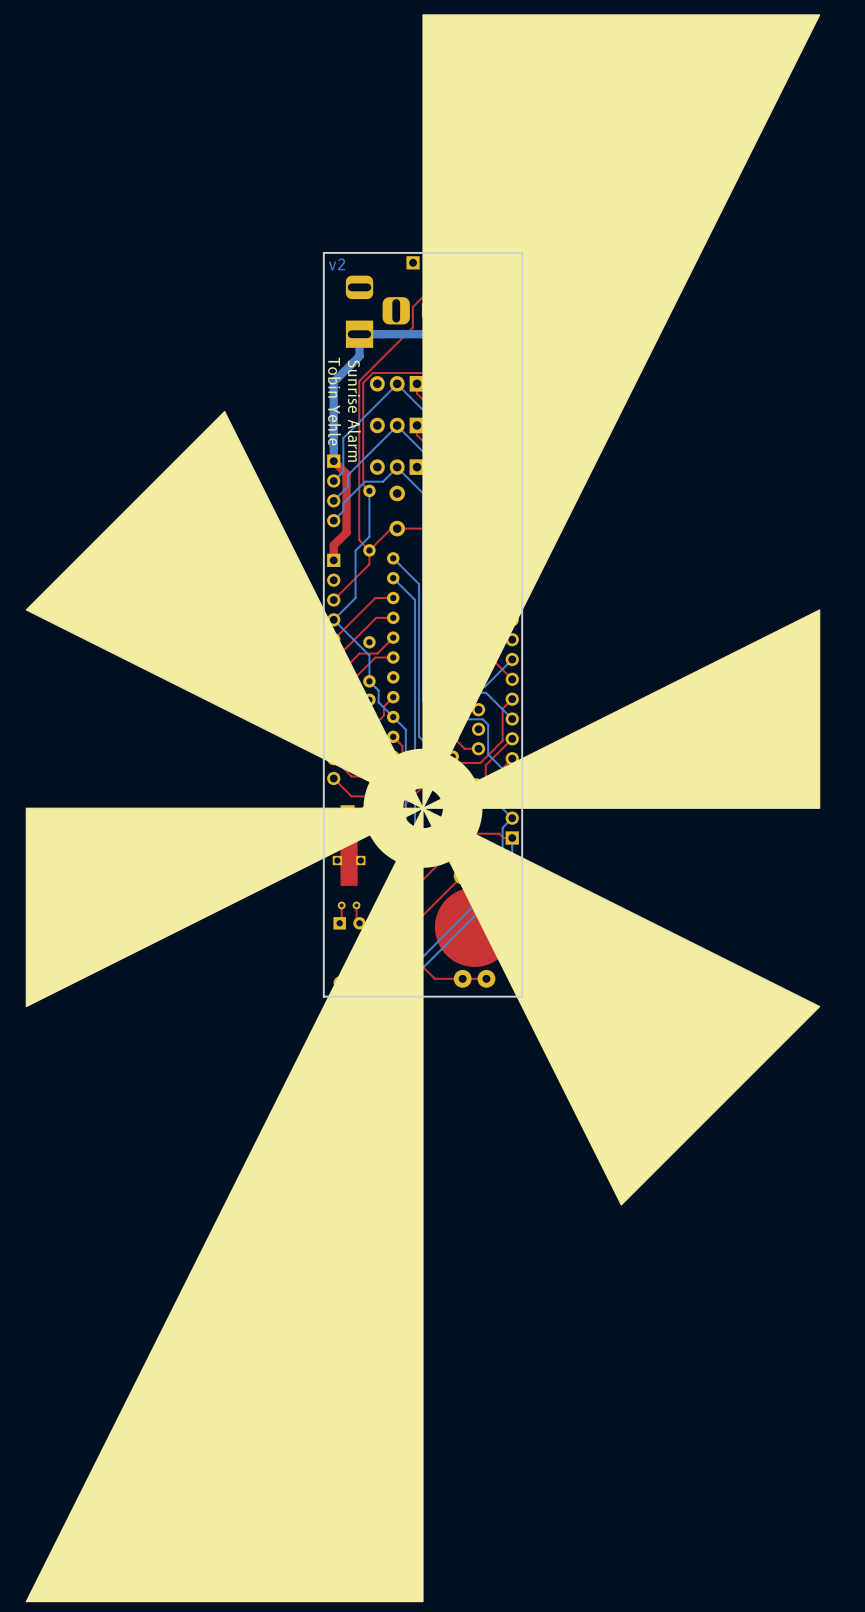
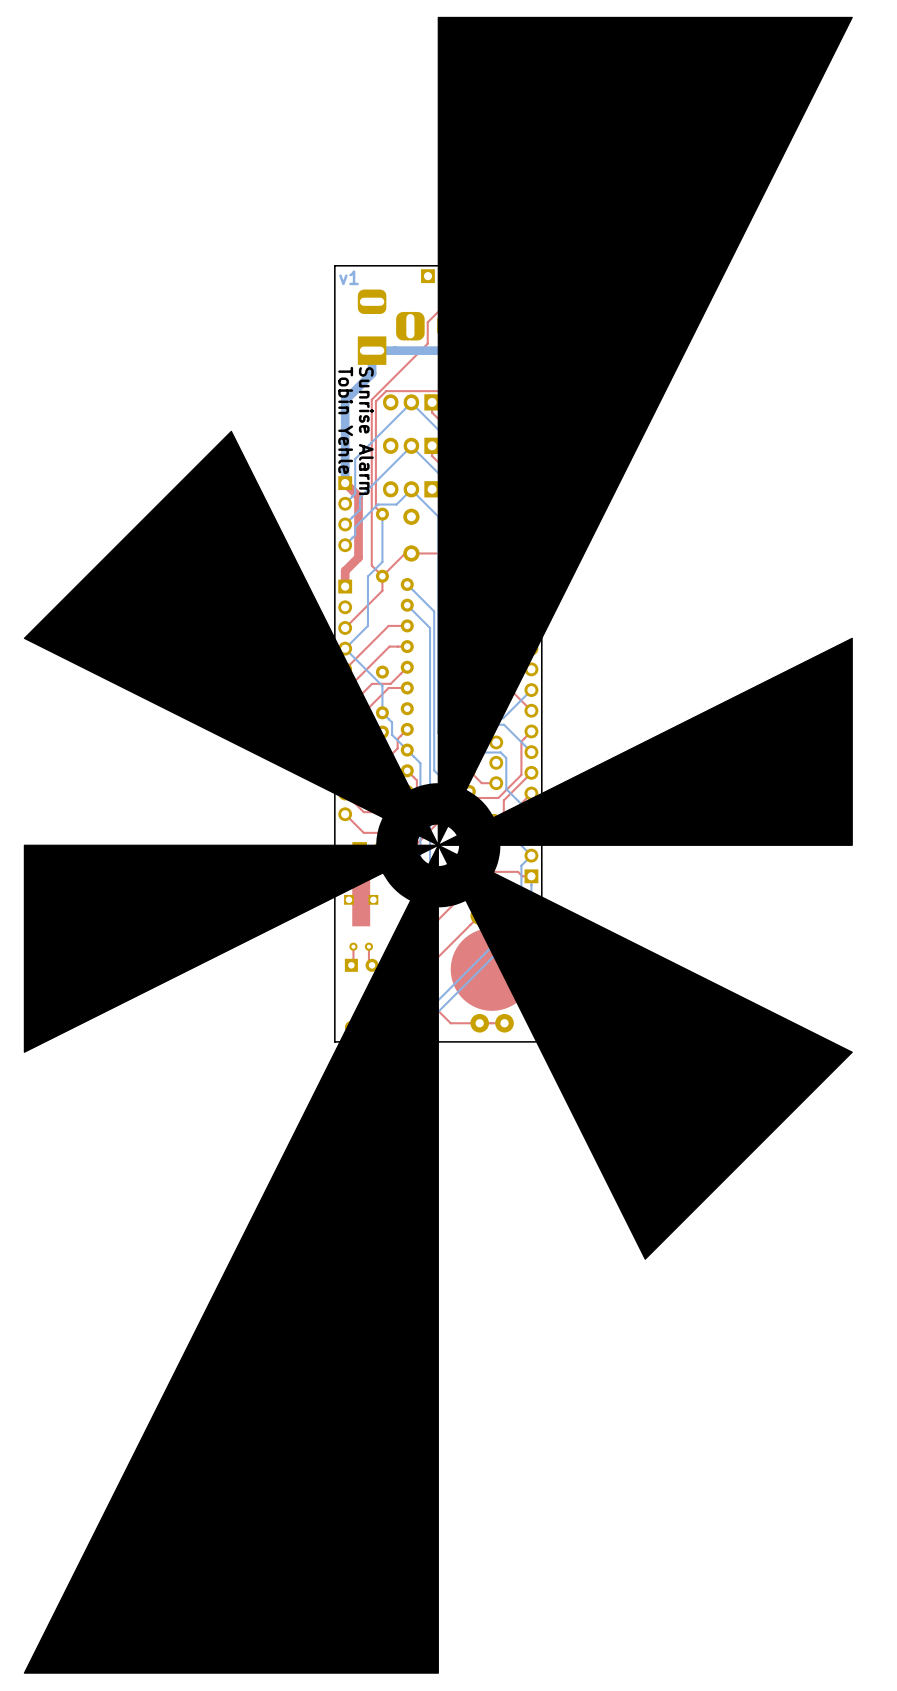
text: v2 (337, 264) -> v1 (349, 277)

